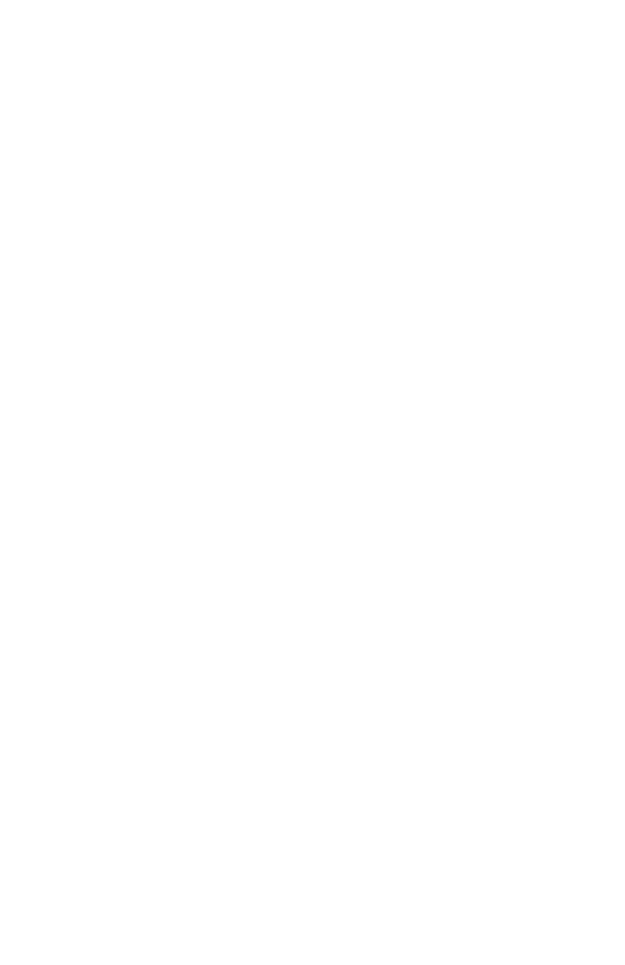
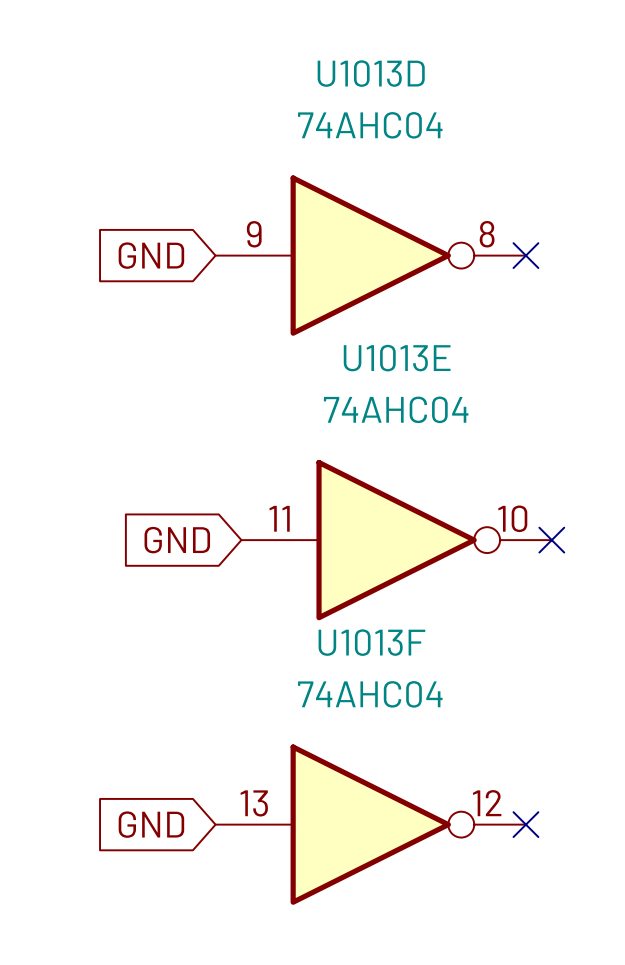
global label: none -> GND (151, 255)
U1013D: none -> 74AHC04 (370, 255)
no-connect mark: none -> (525, 255)
global label: none -> GND (177, 540)
U1013E: none -> 74AHC04 (396, 540)
no-connect mark: none -> (551, 540)
global label: none -> GND (151, 824)
U1013F: none -> 74AHC04 (370, 824)
no-connect mark: none -> (525, 824)

